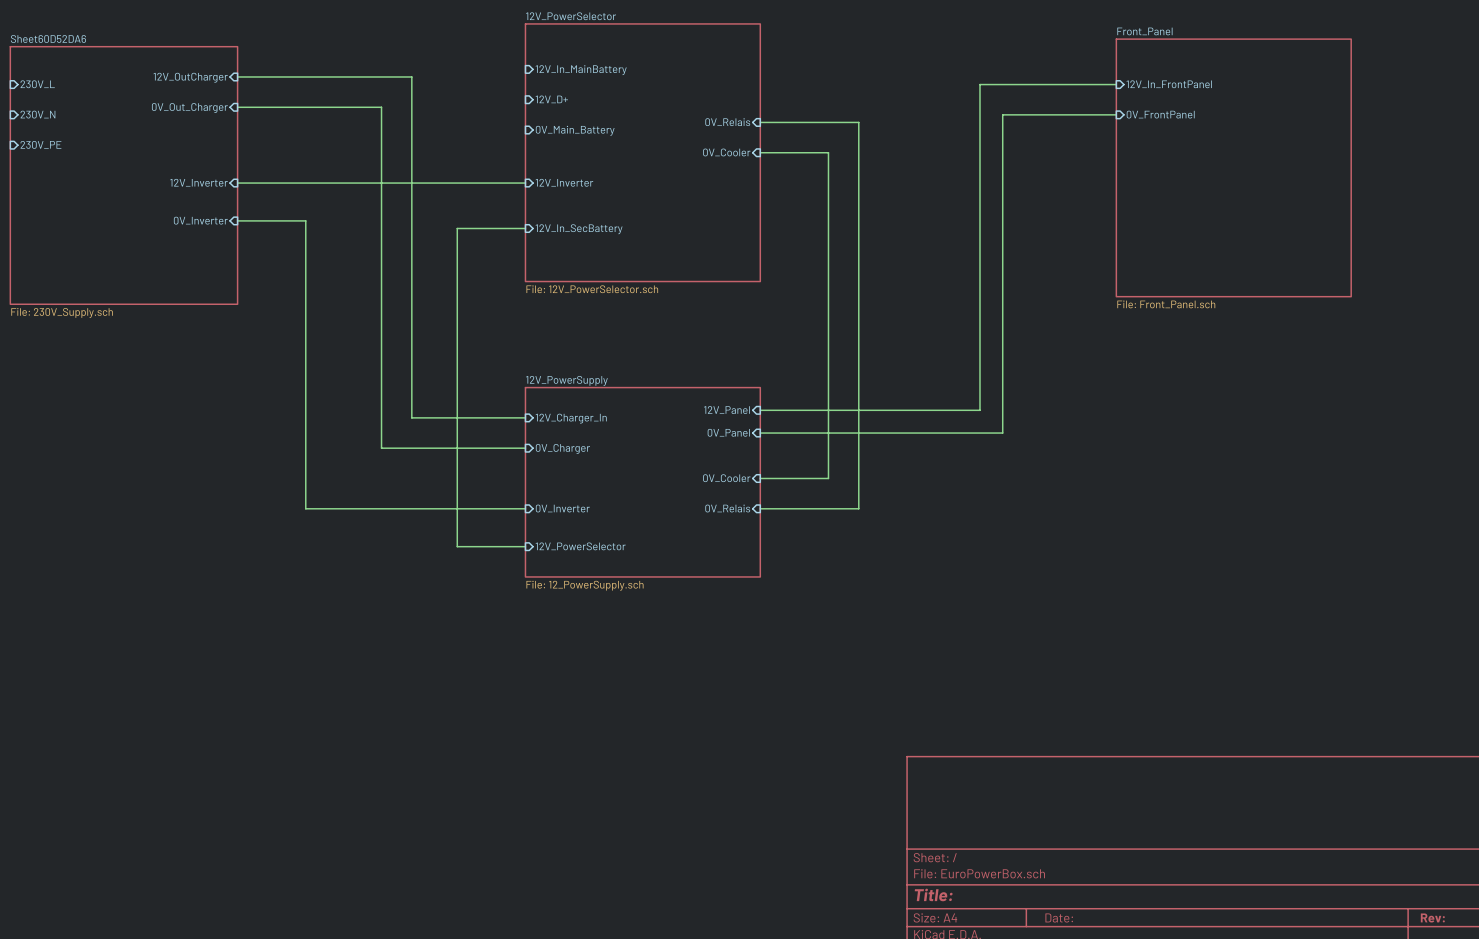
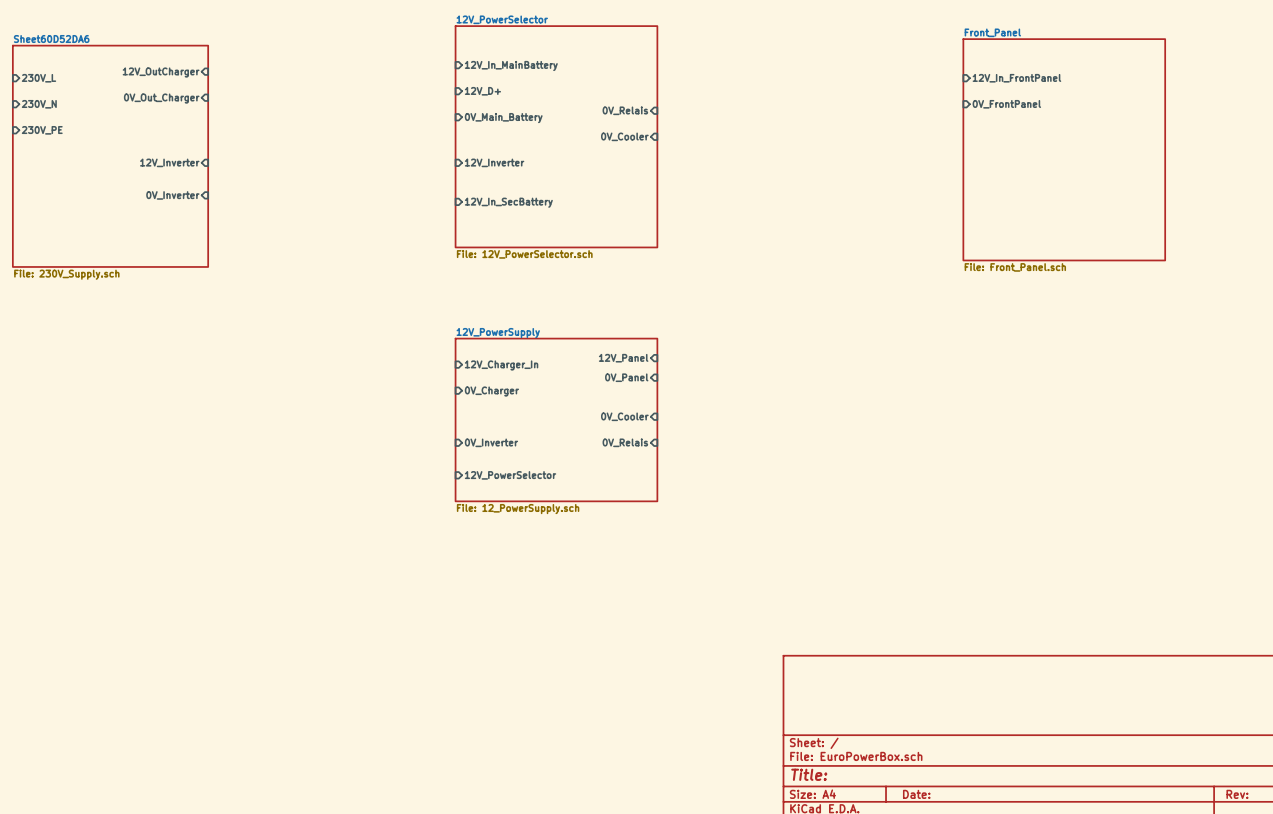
wire: (237, 76) (411, 76) (411, 417) (525, 417) -> none
wire: (1116, 84) (979, 84) (979, 410) (760, 410) -> none
wire: (237, 107) (381, 107) (381, 448) (525, 448) -> none
wire: (1116, 114) (1002, 114) (1002, 433) (760, 433) -> none
wire: (760, 122) (858, 122) (858, 508) (760, 508) -> none
wire: (760, 152) (828, 152) (828, 478) (760, 478) -> none
wire: (237, 183) (525, 183) -> none
wire: (237, 220) (305, 220) (305, 508) (525, 508) -> none
wire: (525, 228) (457, 228) (457, 546) (525, 546) -> none

